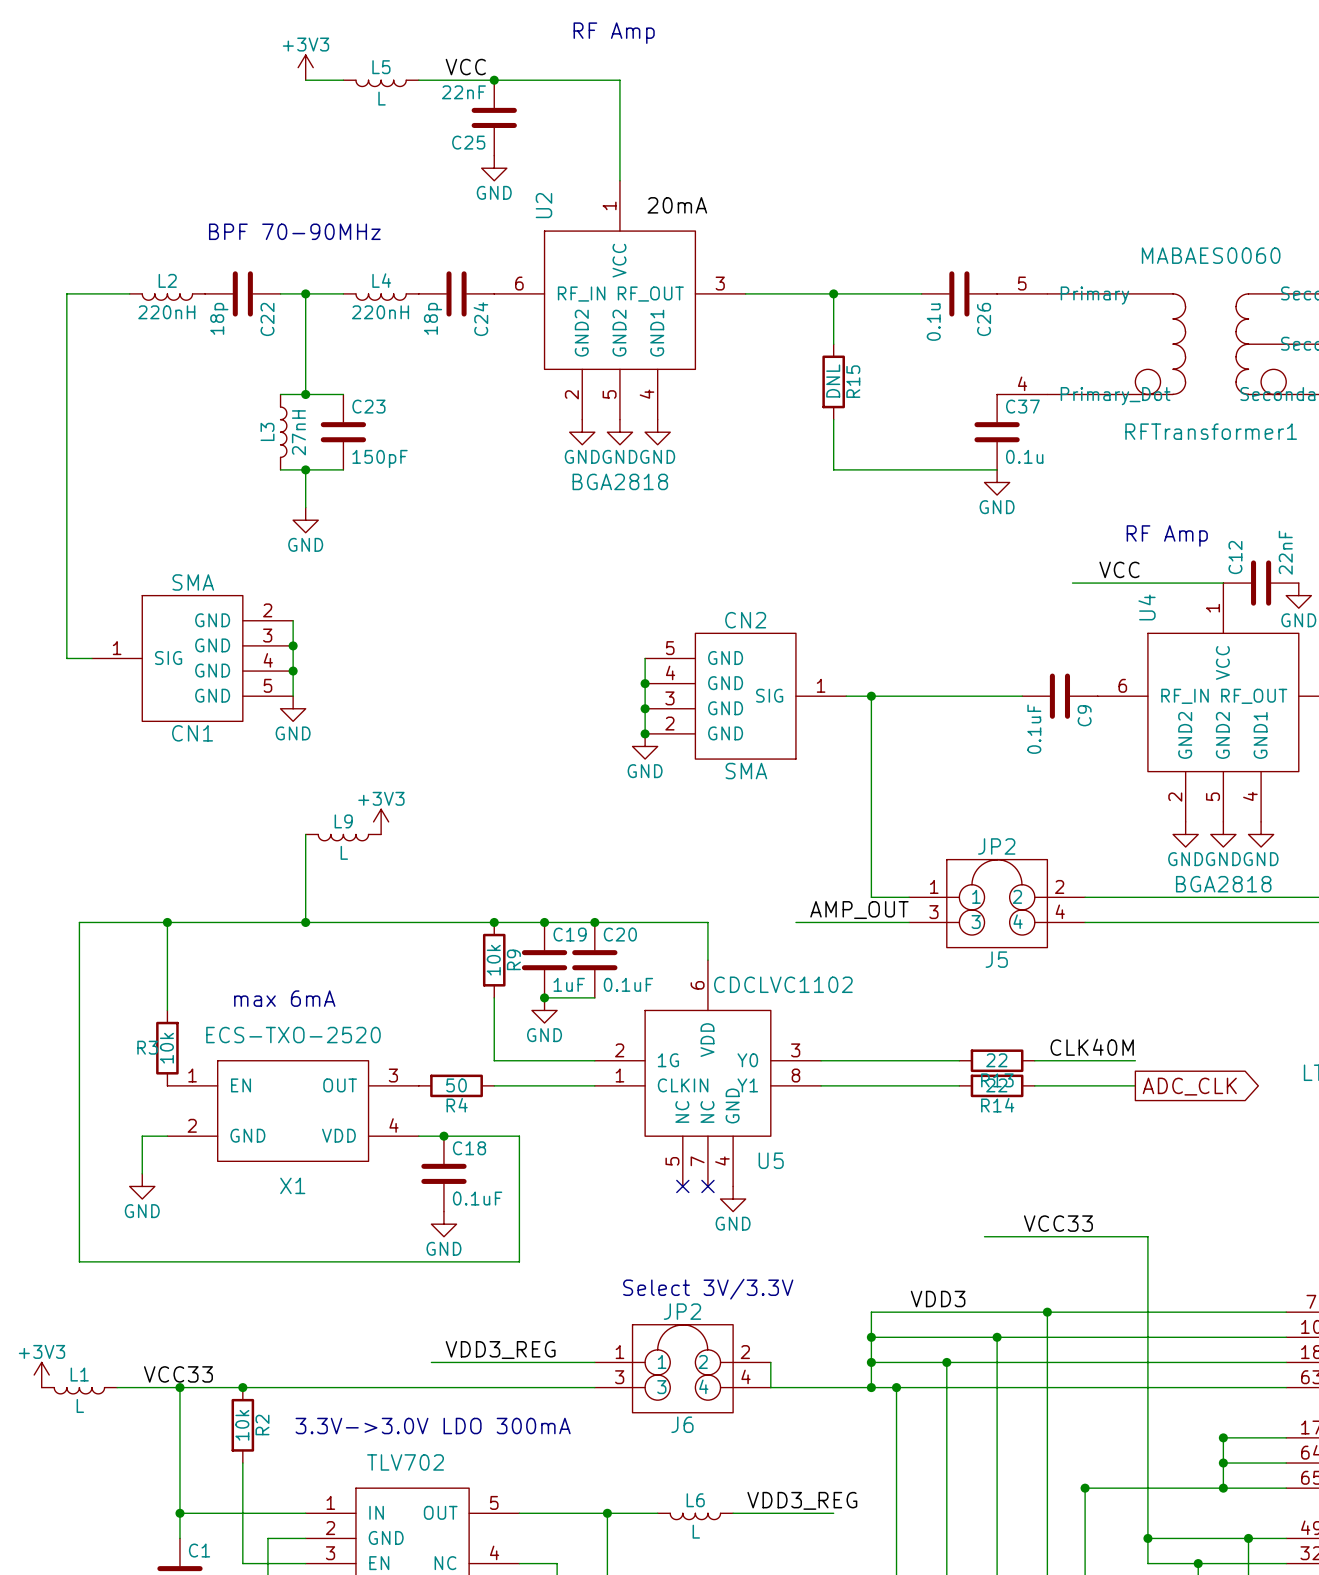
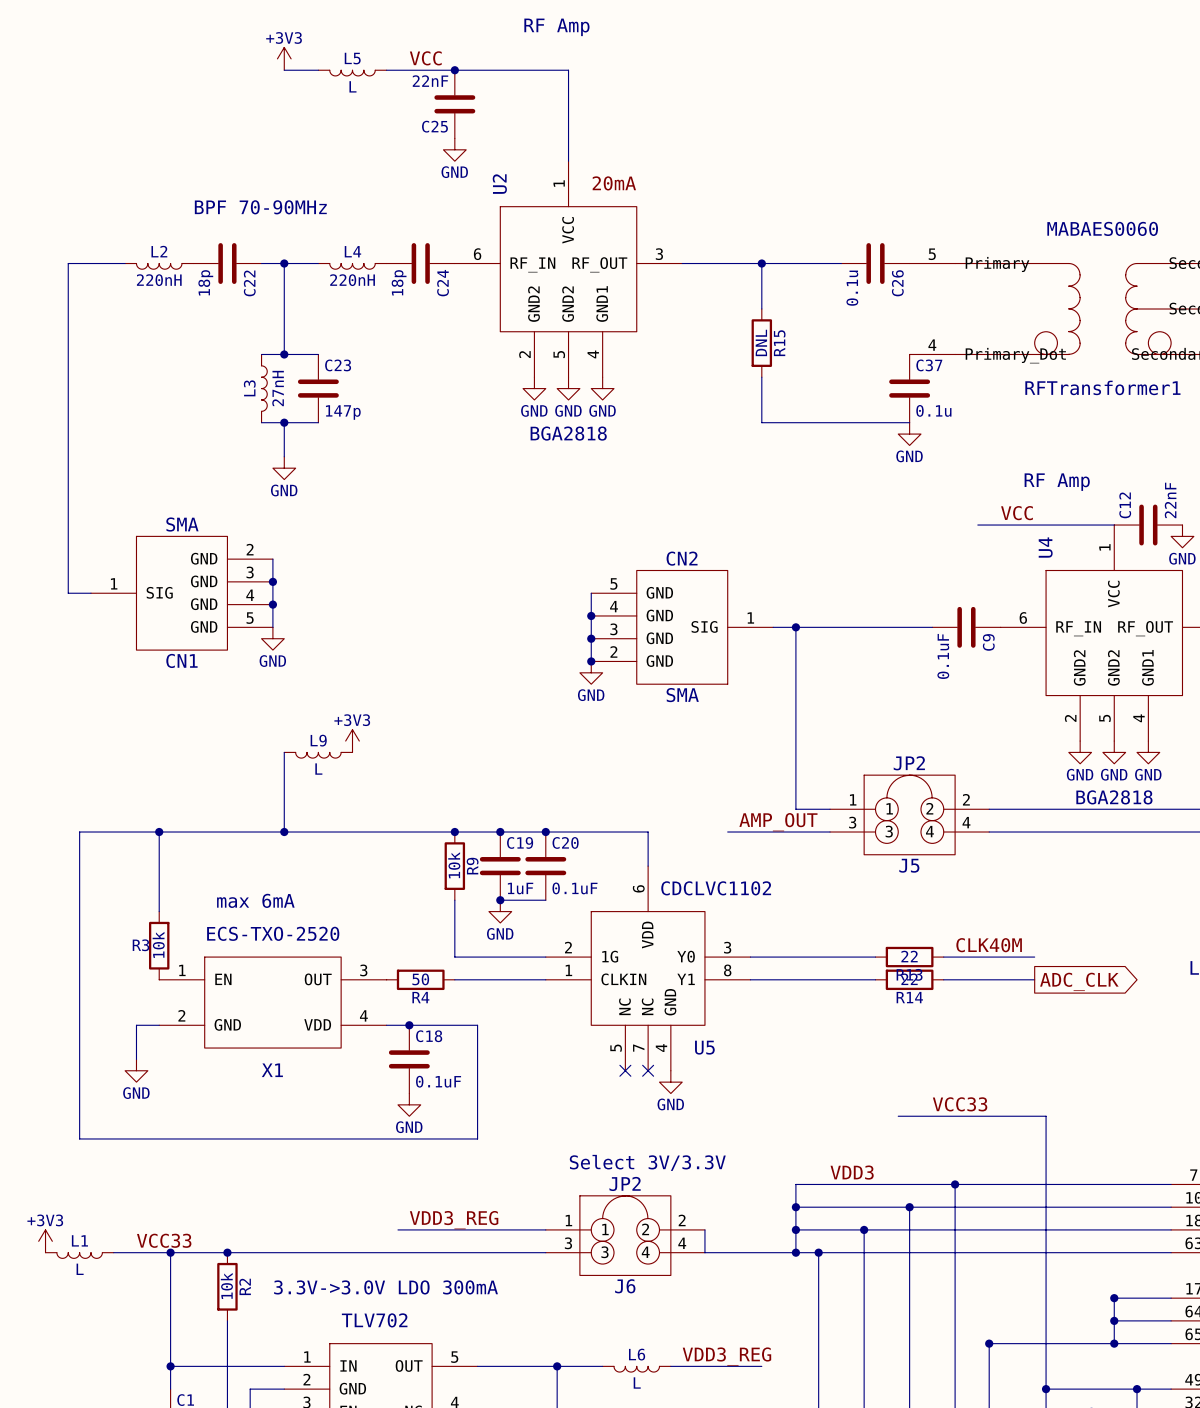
C23 value: 150pF (380, 458) -> 147p (343, 412)

